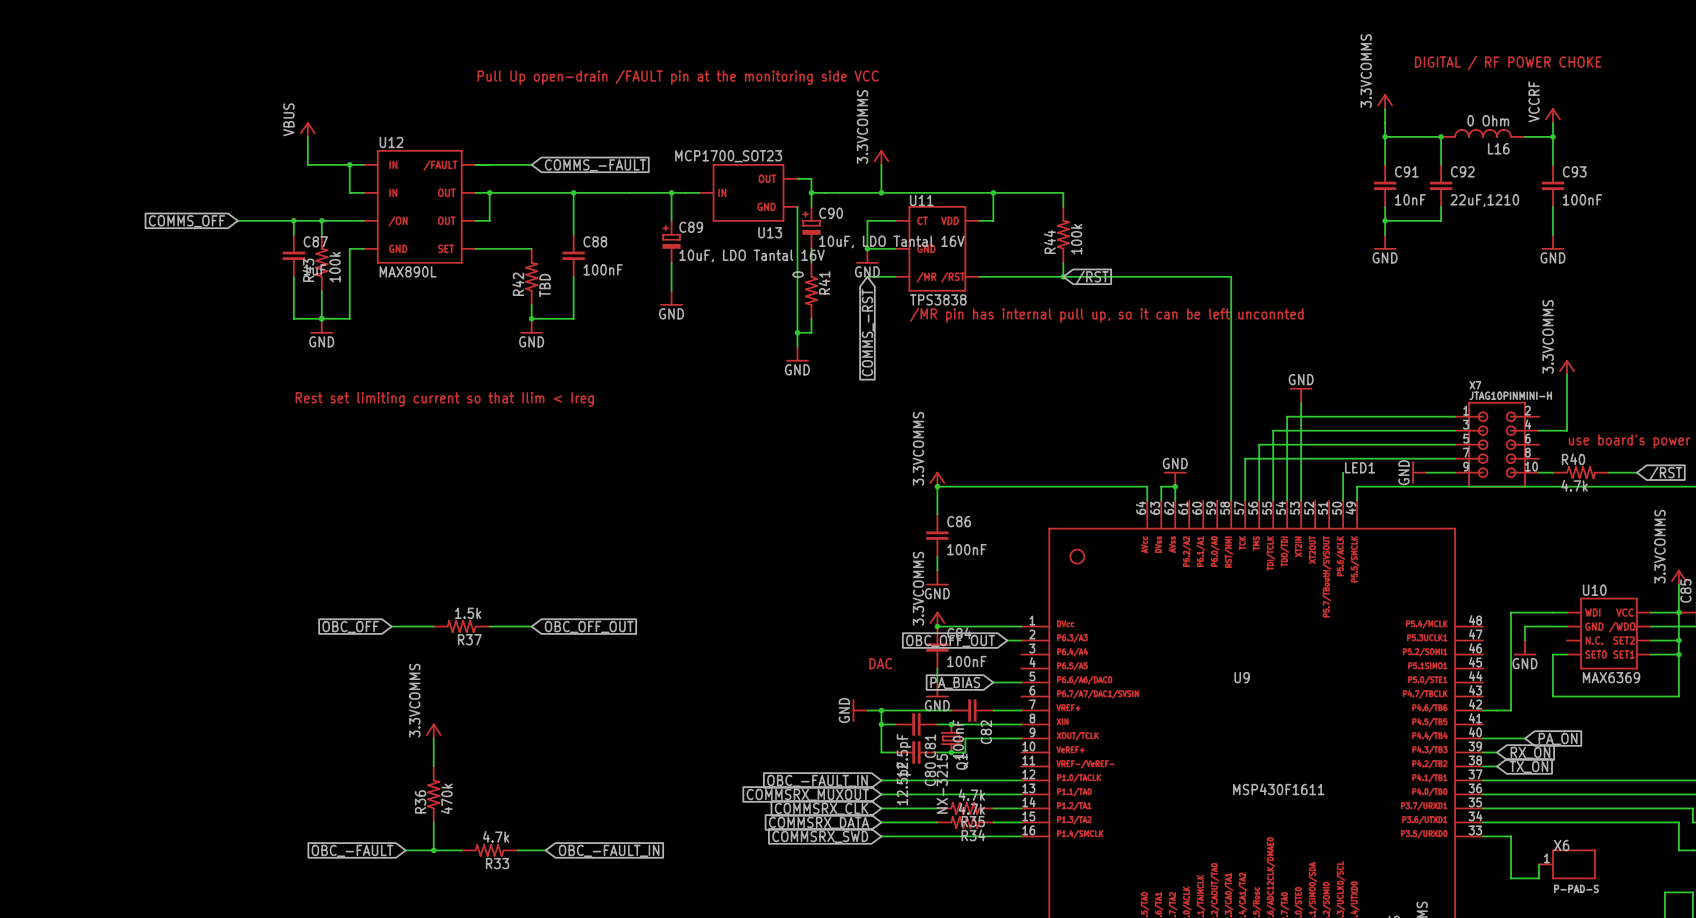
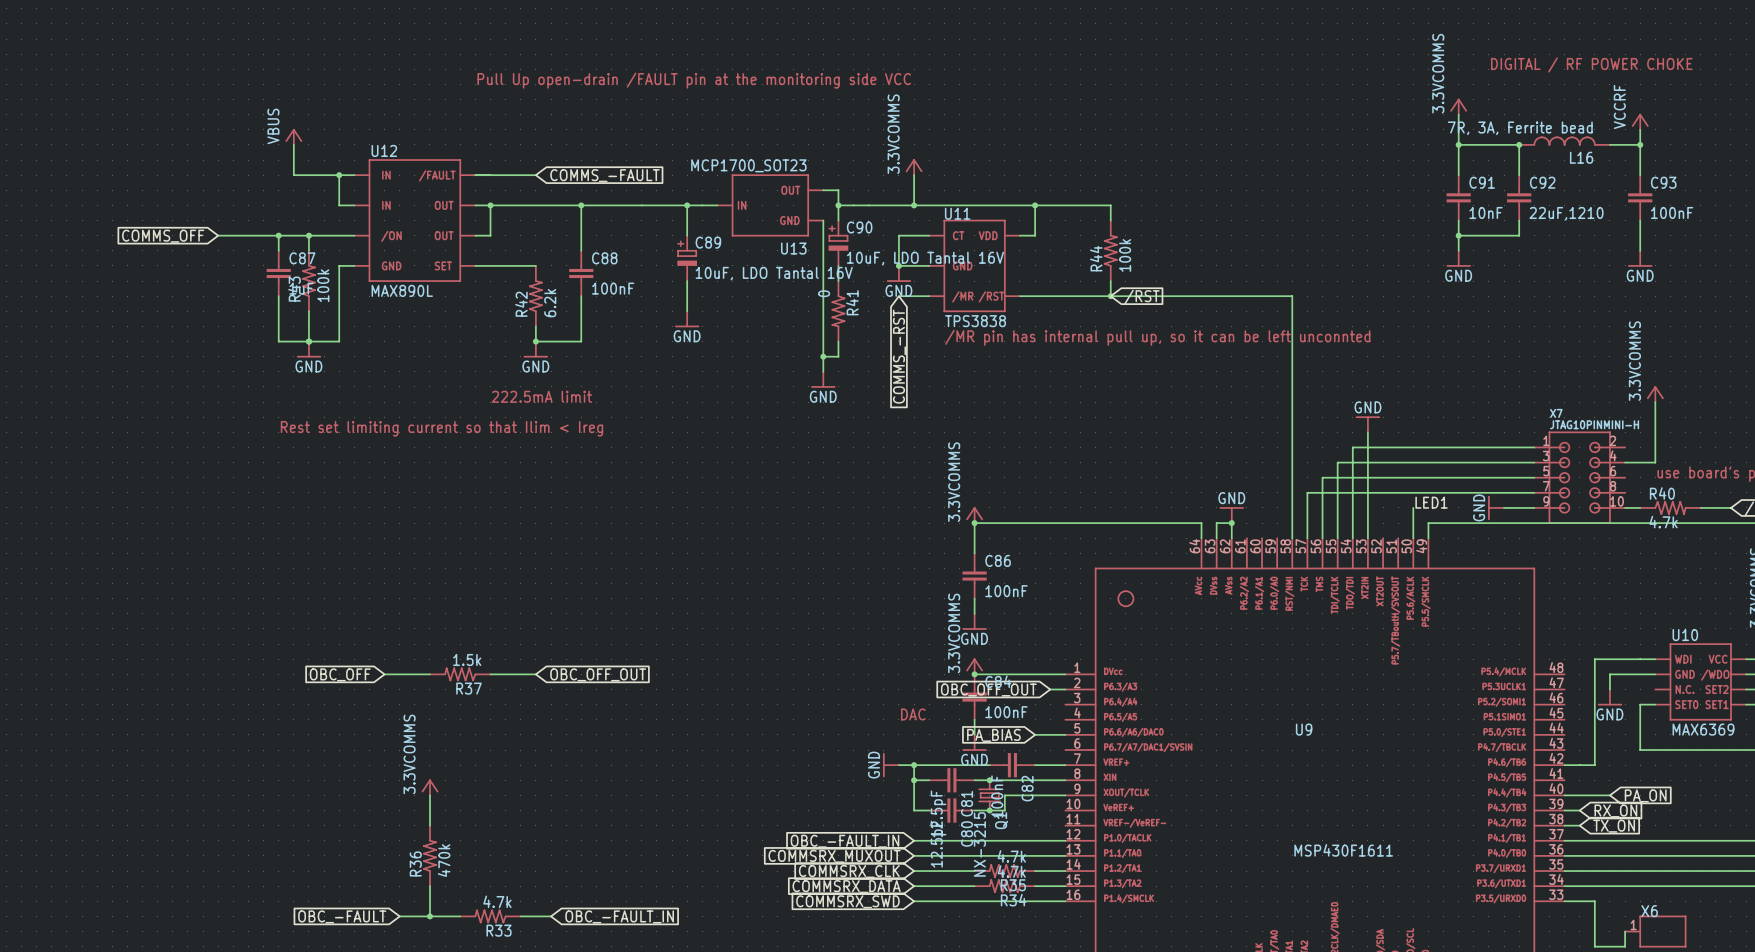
L16 value: 0 Ohm (1488, 120) -> 7R, 3A, Ferrite bead (1520, 128)
R42 value: TBD (544, 285) -> 6.2k (550, 303)
text: none -> 222.5mA limit (541, 396)

